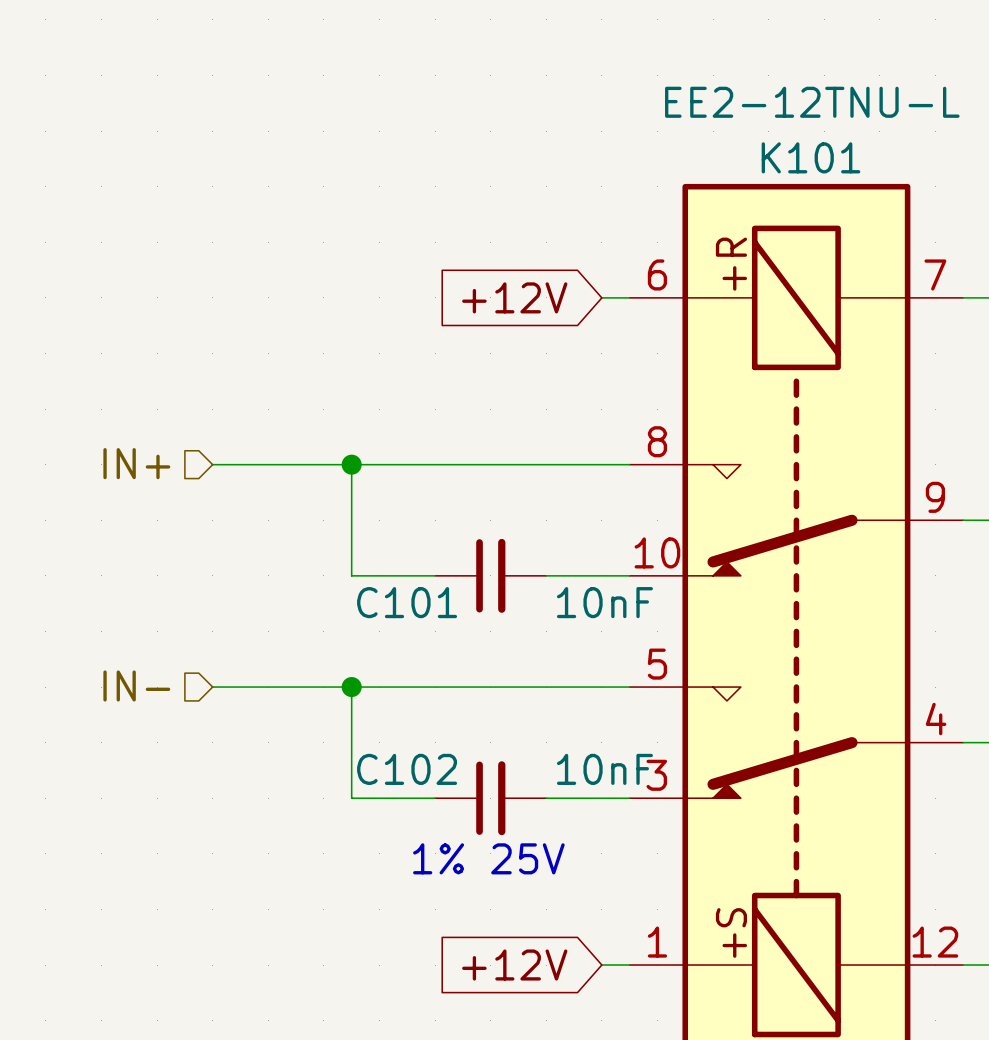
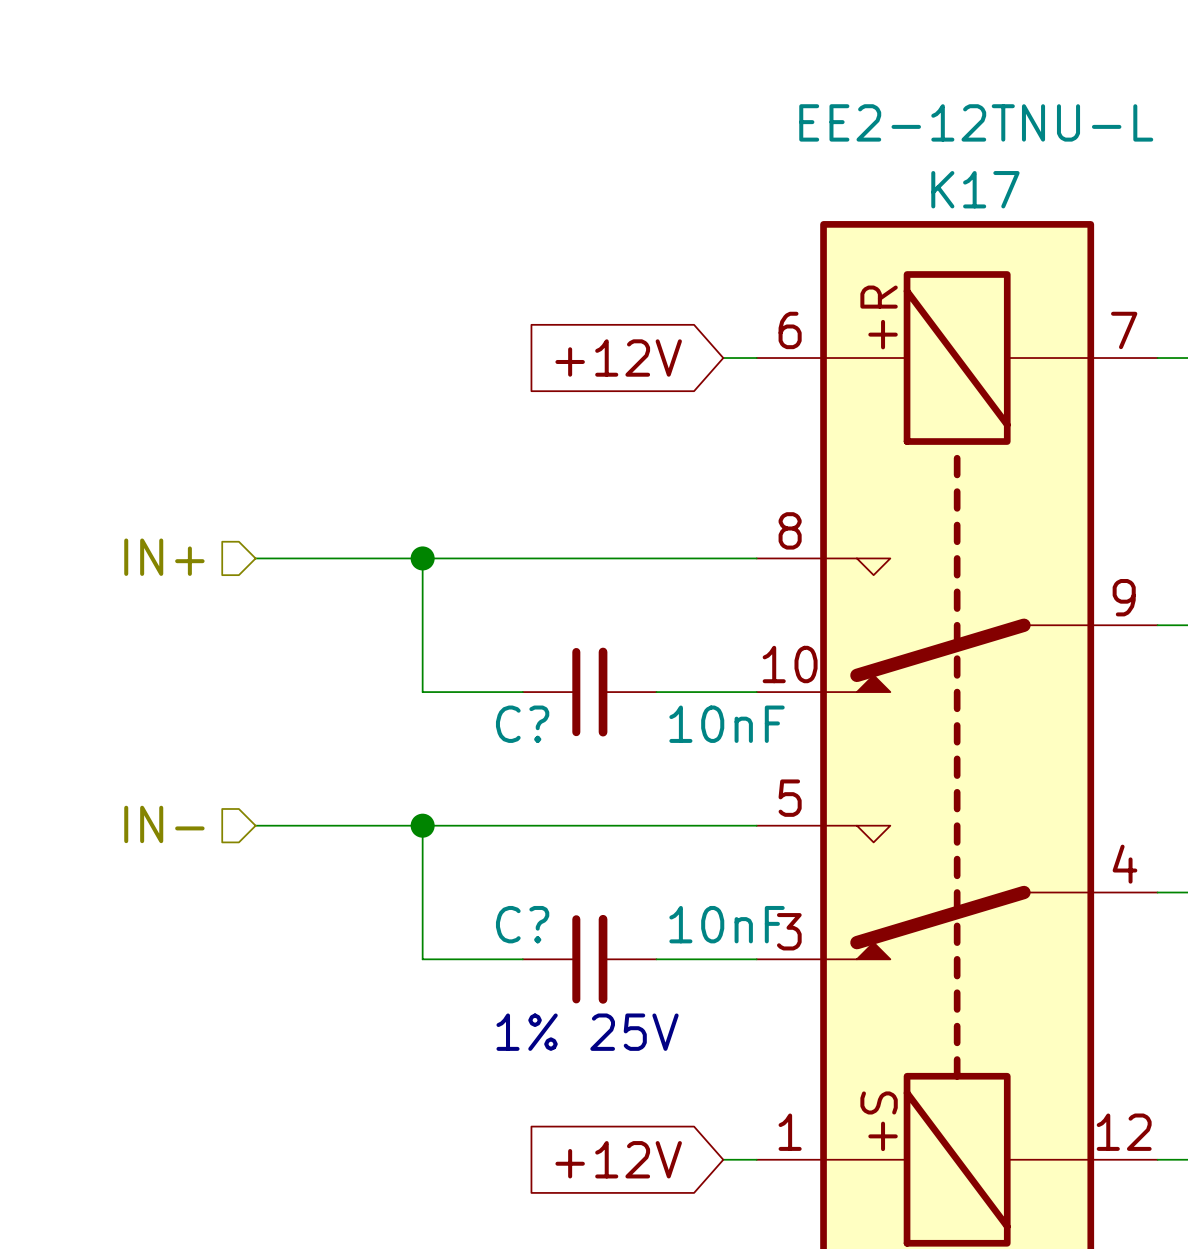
K101 name: K101 (810, 157) -> K17 (975, 189)
C101 name: C101 (407, 602) -> C? (522, 724)
C102 name: C102 (407, 769) -> C? (522, 924)

